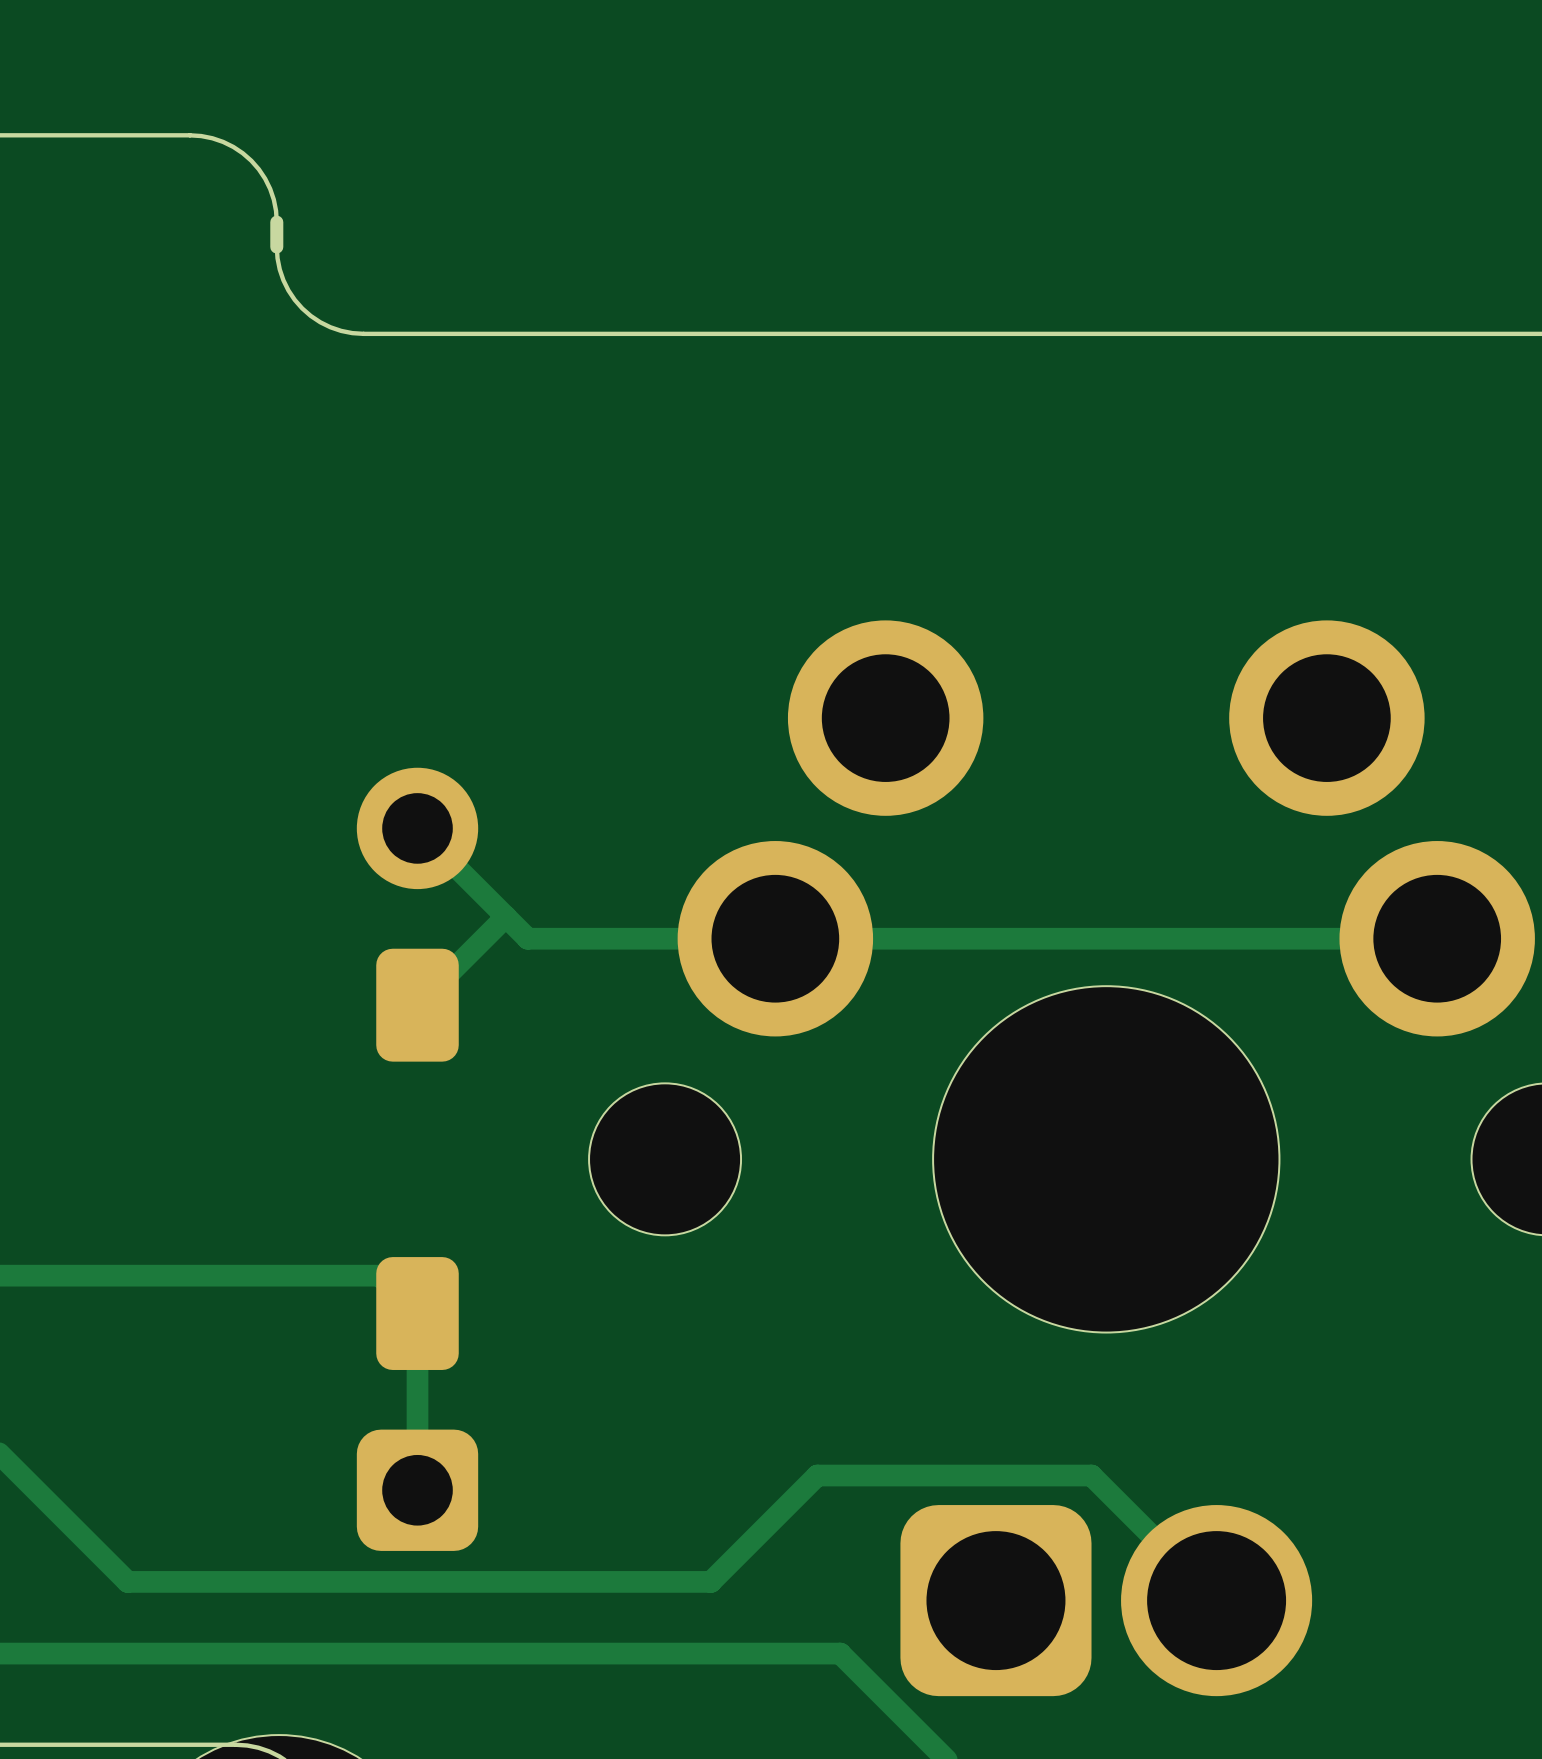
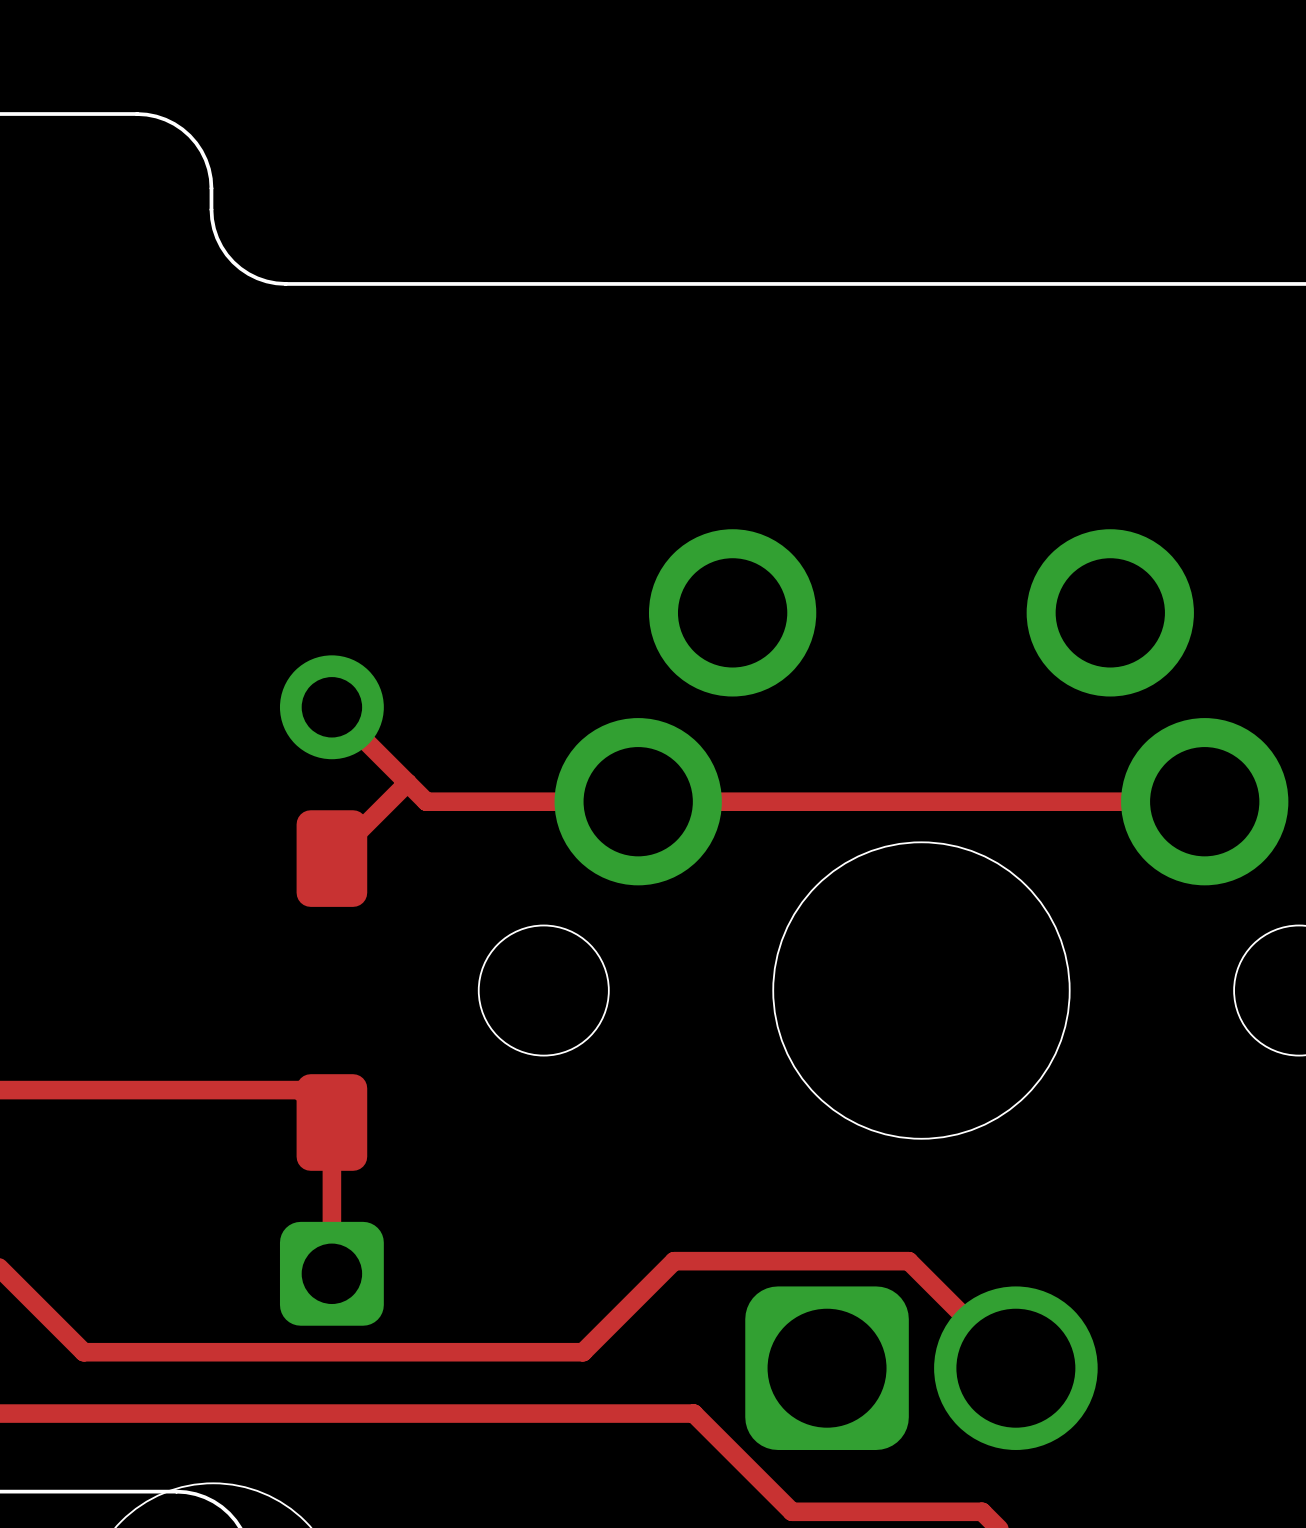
board edge width: thick (276, 222) (276, 247) -> thin (211, 188) (211, 209)

